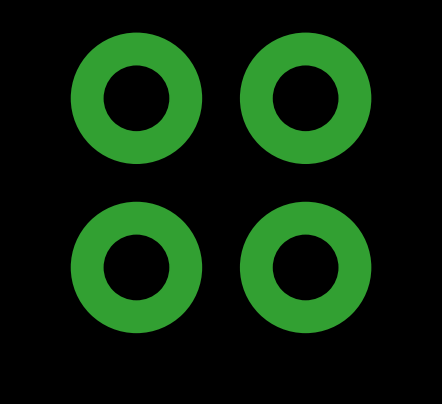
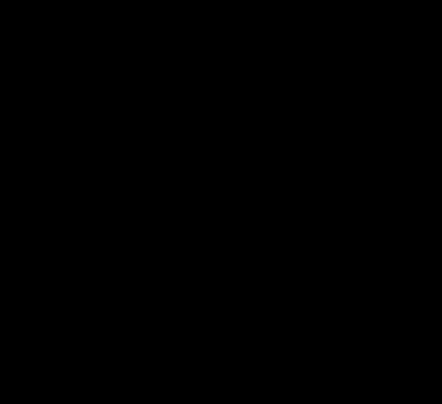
part: (136, 98) -> none
part: (305, 98) -> none
part: (136, 267) -> none
part: (305, 267) -> none

